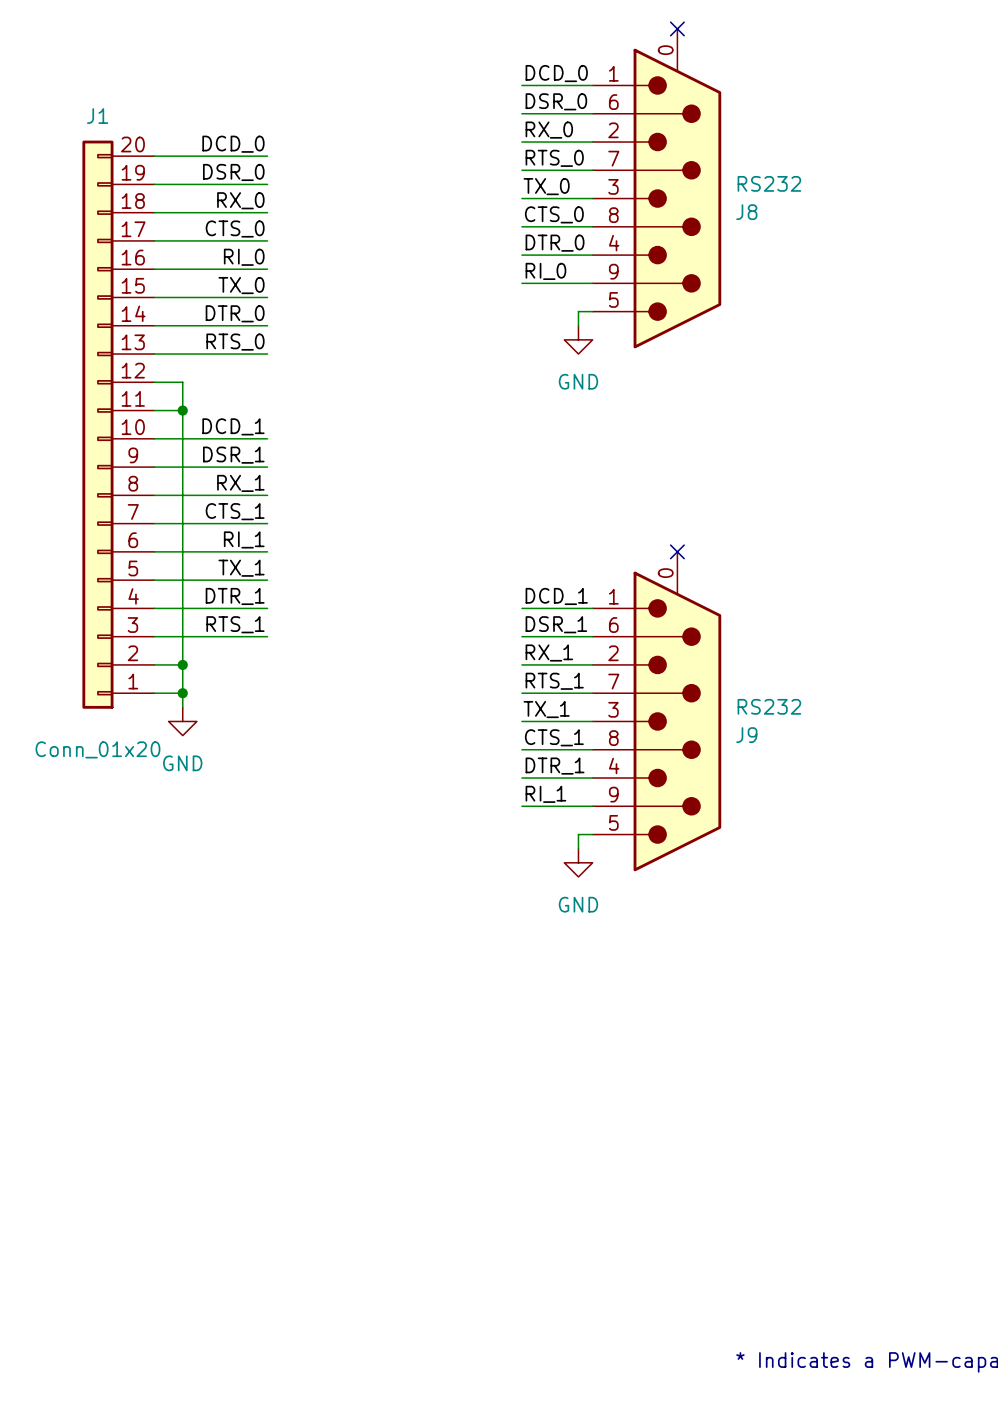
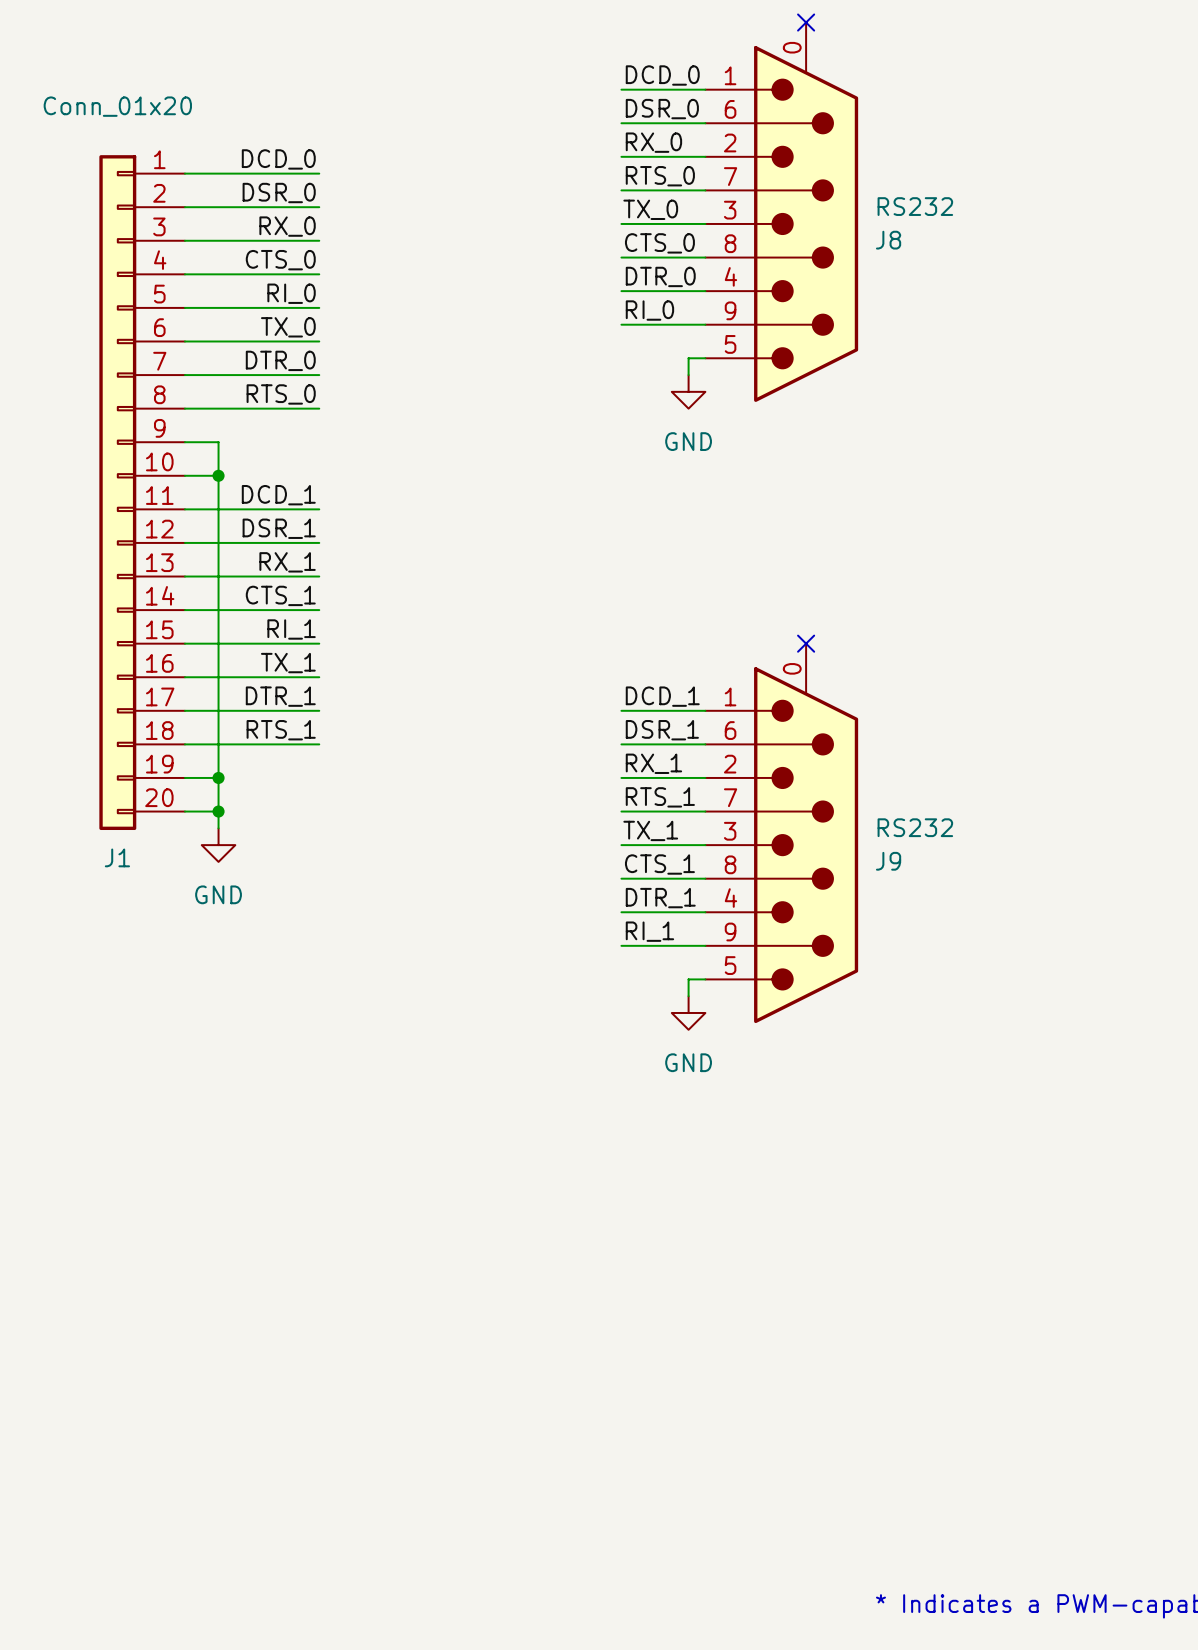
J1 flip: as is (97, 424) -> up-down (117, 492)

